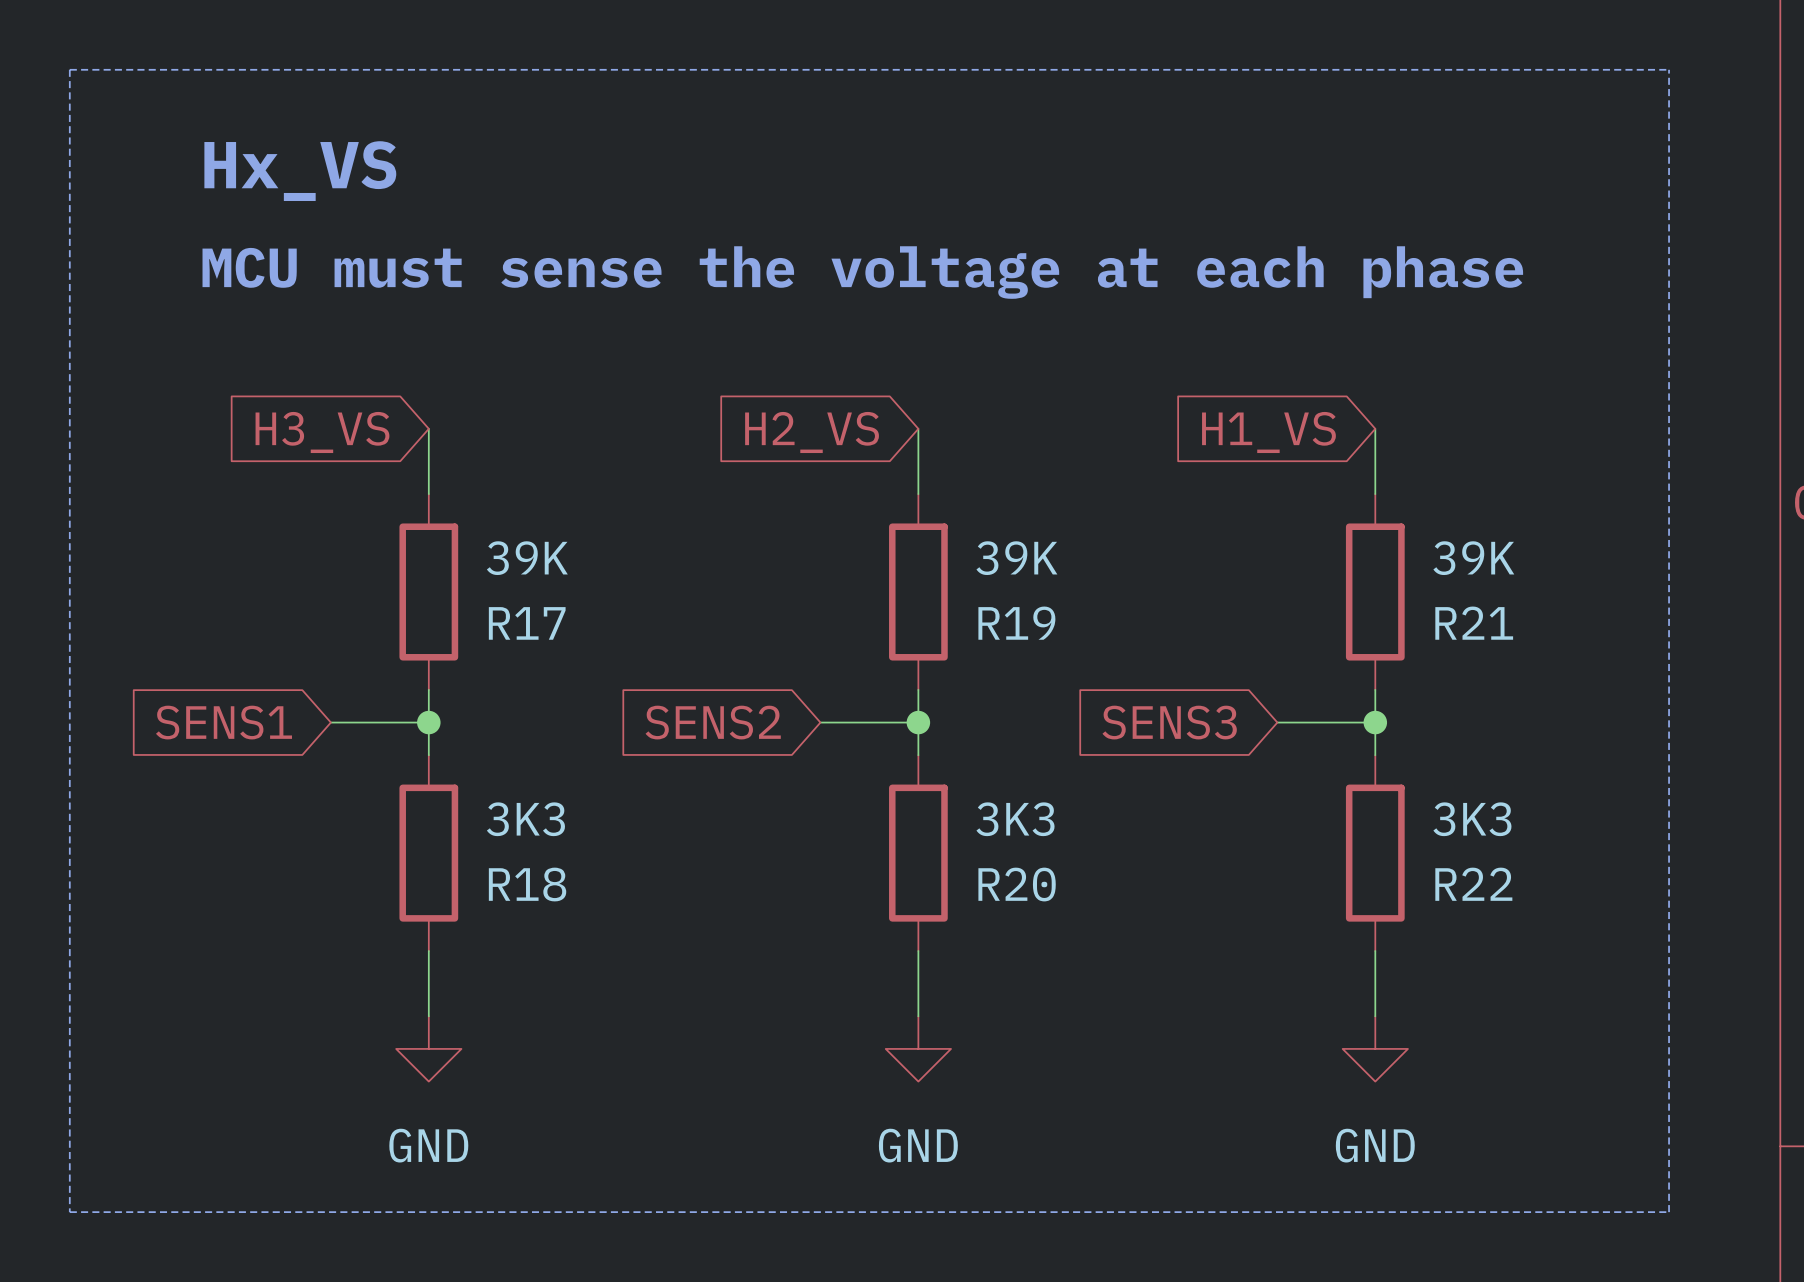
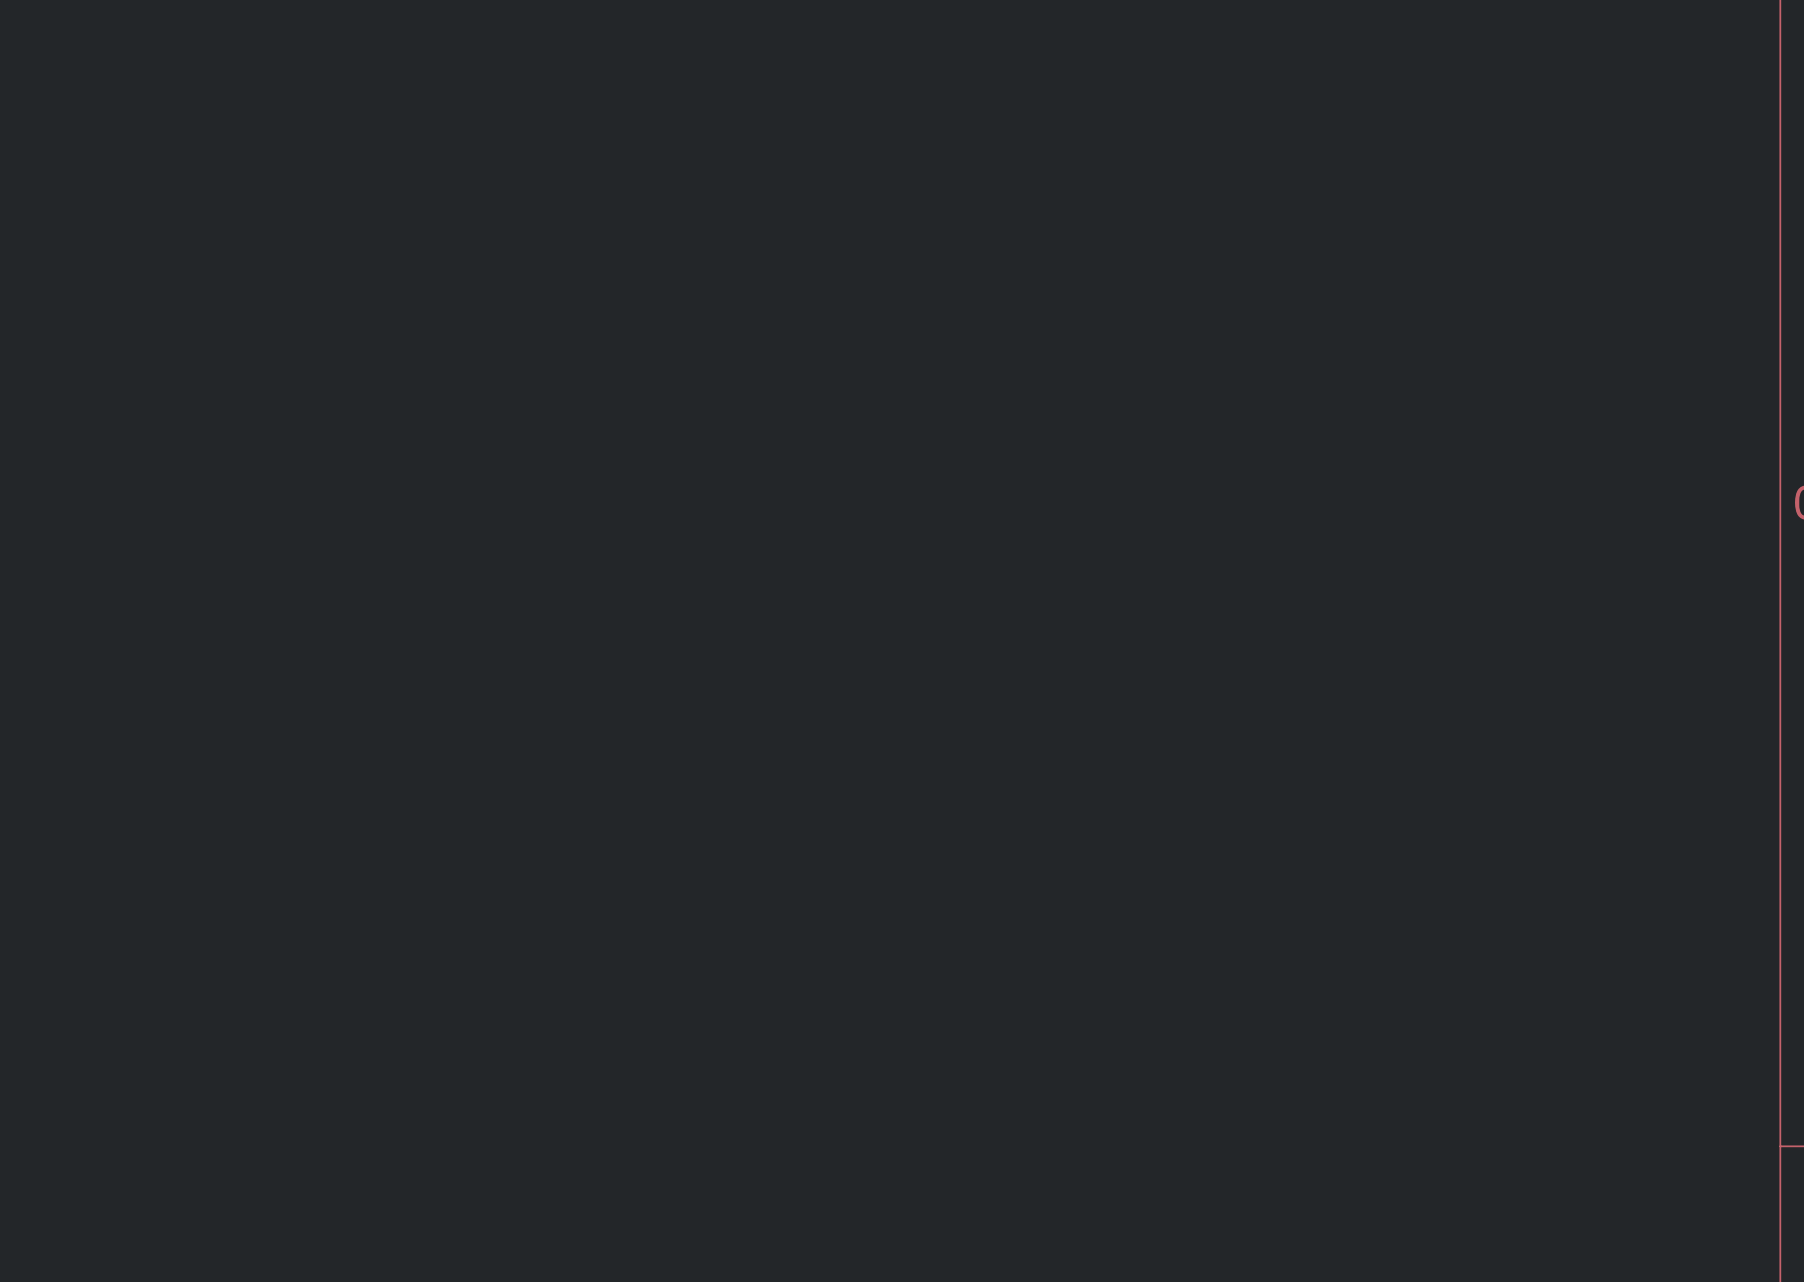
line: (69, 69) (69, 1212) (1669, 1212) (1669, 69) (69, 69) -> none
text: Hx_VS (300, 171) -> none
text: MCU must sense the voltage at each phase (862, 272) -> none
wire: (428, 428) (428, 494) -> none
wire: (918, 428) (918, 494) -> none
wire: (1375, 428) (1375, 494) -> none
global label: H3_VS (322, 432) -> none
global label: H2_VS (812, 432) -> none
global label: H1_VS (1268, 432) -> none
R17: 39K (428, 592) -> none
R19: 39K (918, 592) -> none
R21: 39K (1375, 592) -> none
wire: (428, 689) (428, 755) -> none
wire: (918, 689) (918, 755) -> none
wire: (1375, 689) (1375, 755) -> none
global label: SENS1 (224, 722) -> none
wire: (330, 722) (428, 722) -> none
junction: (428, 722) -> none
global label: SENS2 (713, 722) -> none
wire: (820, 722) (918, 722) -> none
junction: (918, 722) -> none
global label: SENS3 (1169, 722) -> none
wire: (1277, 722) (1375, 722) -> none
junction: (1375, 722) -> none
R18: 3K3 (428, 853) -> none
R20: 3K3 (918, 853) -> none
R22: 3K3 (1375, 853) -> none
wire: (428, 951) (428, 1016) -> none
wire: (918, 951) (918, 1016) -> none
wire: (1375, 951) (1375, 1016) -> none
power symbol: GND (428, 1048) -> none
power symbol: GND (918, 1048) -> none
power symbol: GND (1375, 1048) -> none

